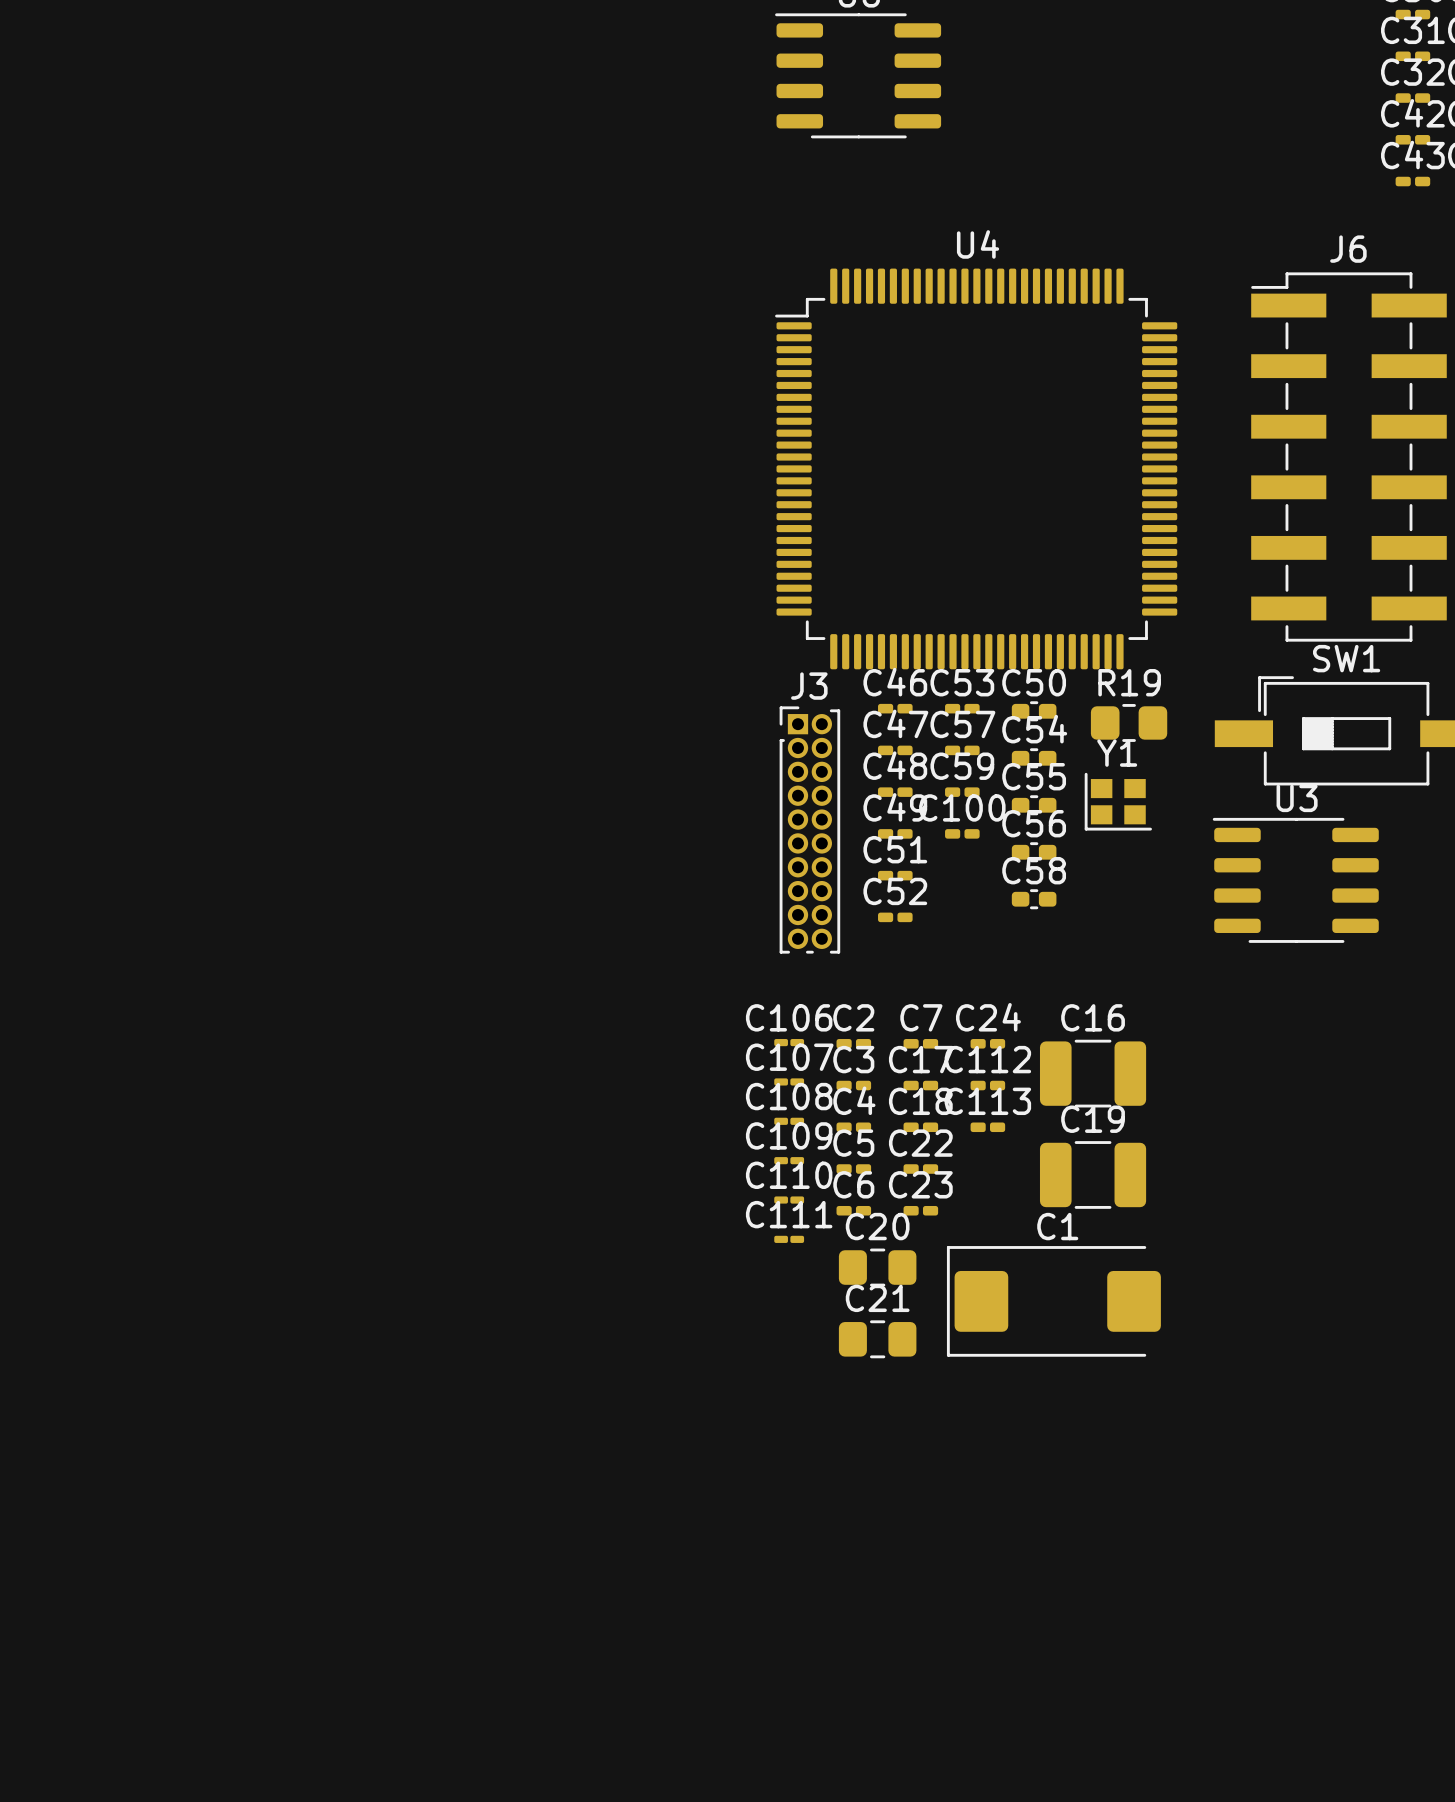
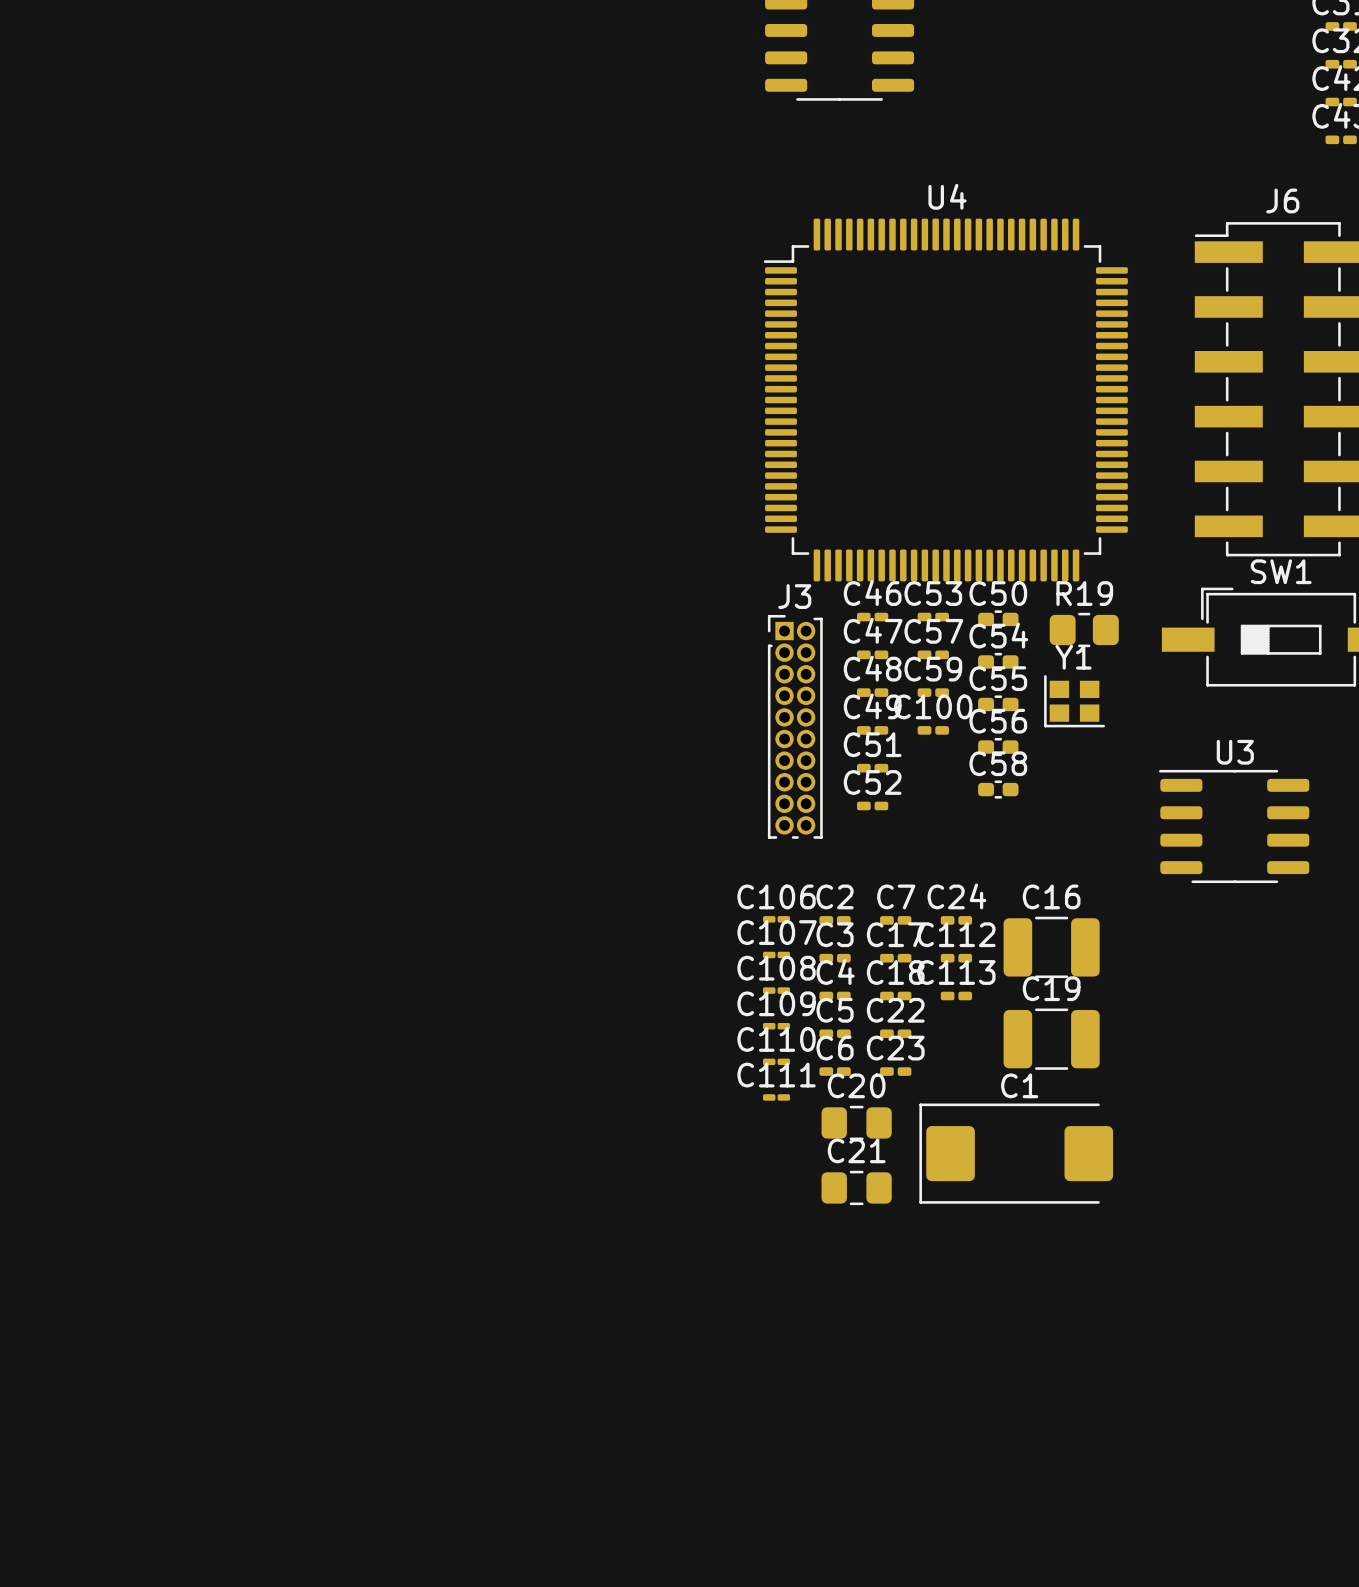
U3 position: (1295, 880) -> (1234, 826)

